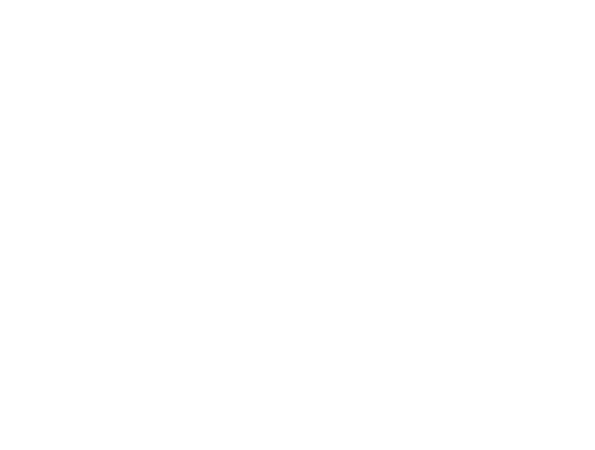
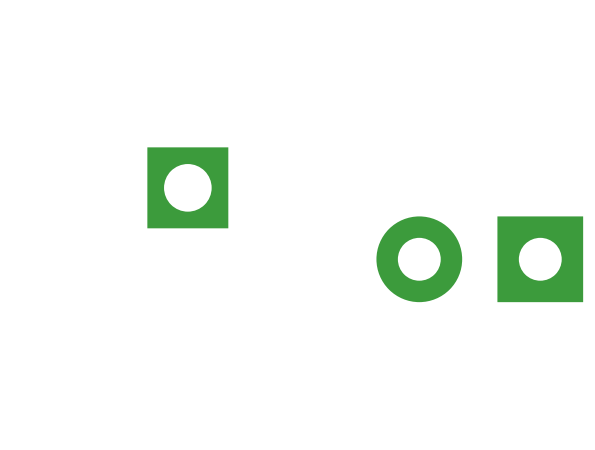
part: none -> (187, 187)
part: none -> (479, 259)

